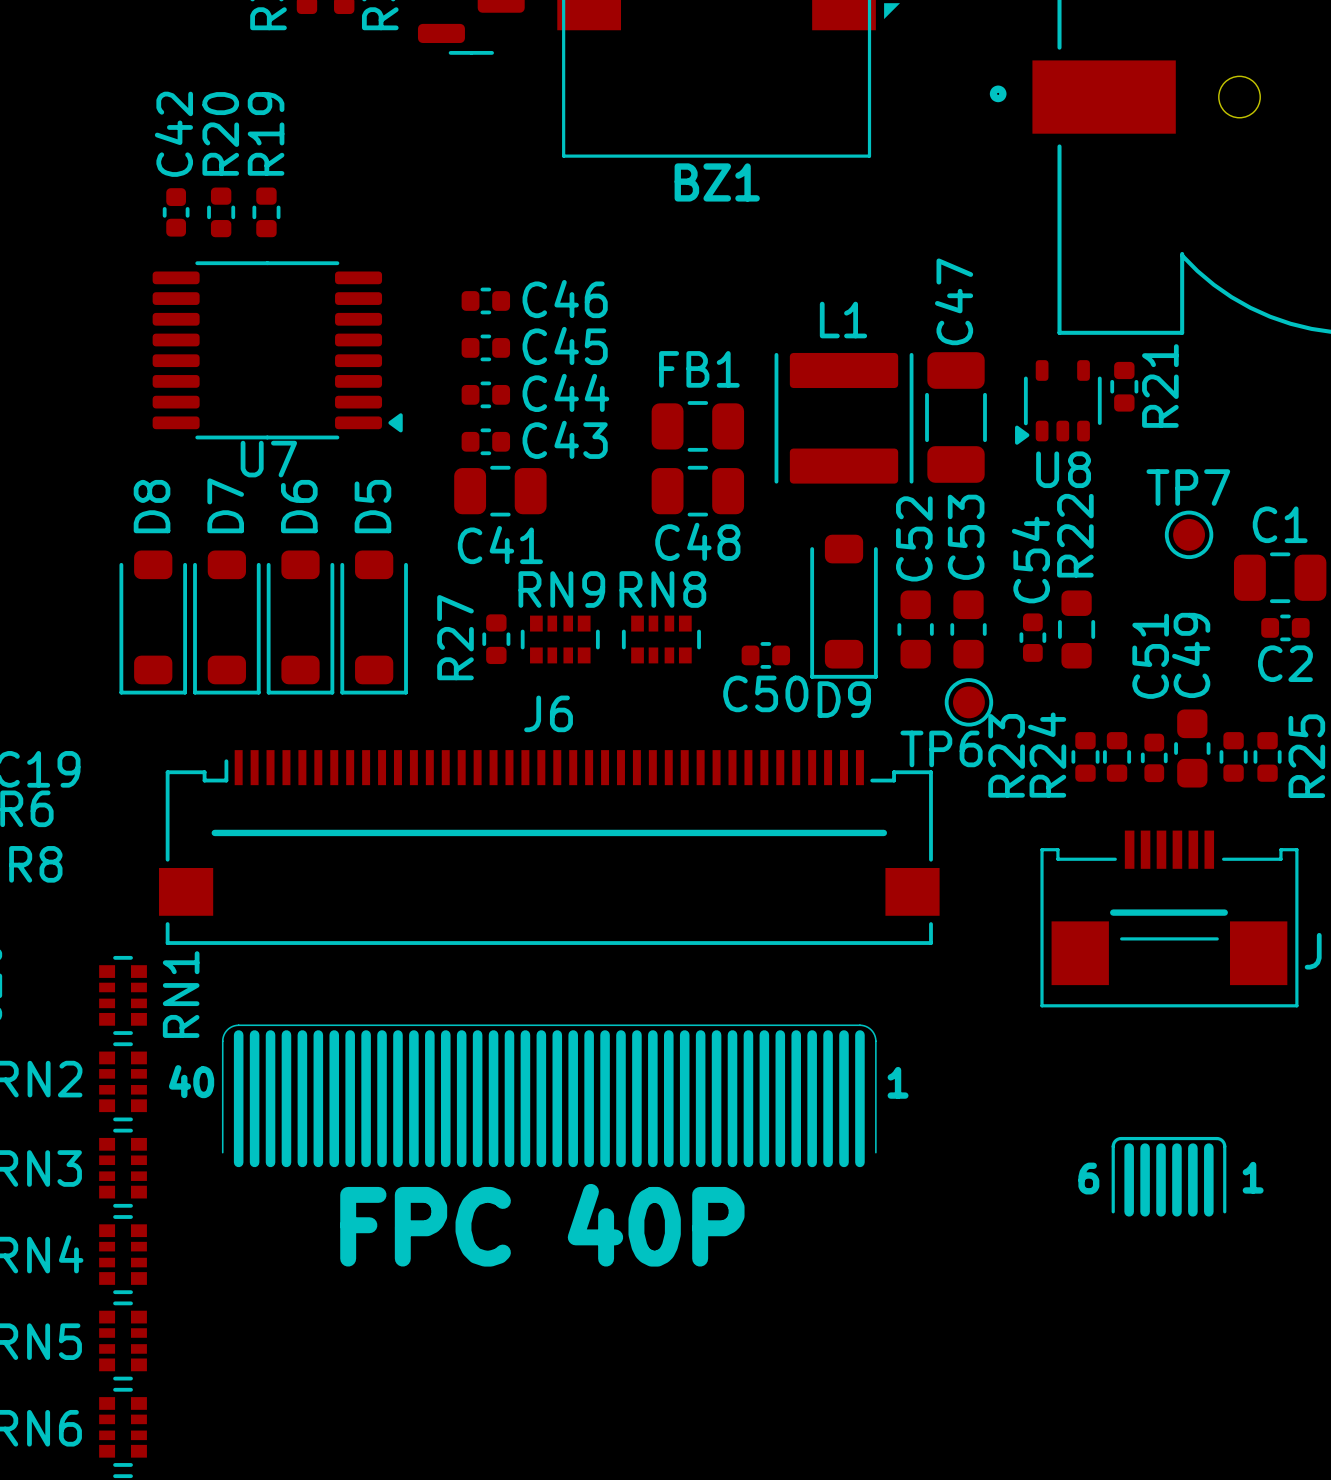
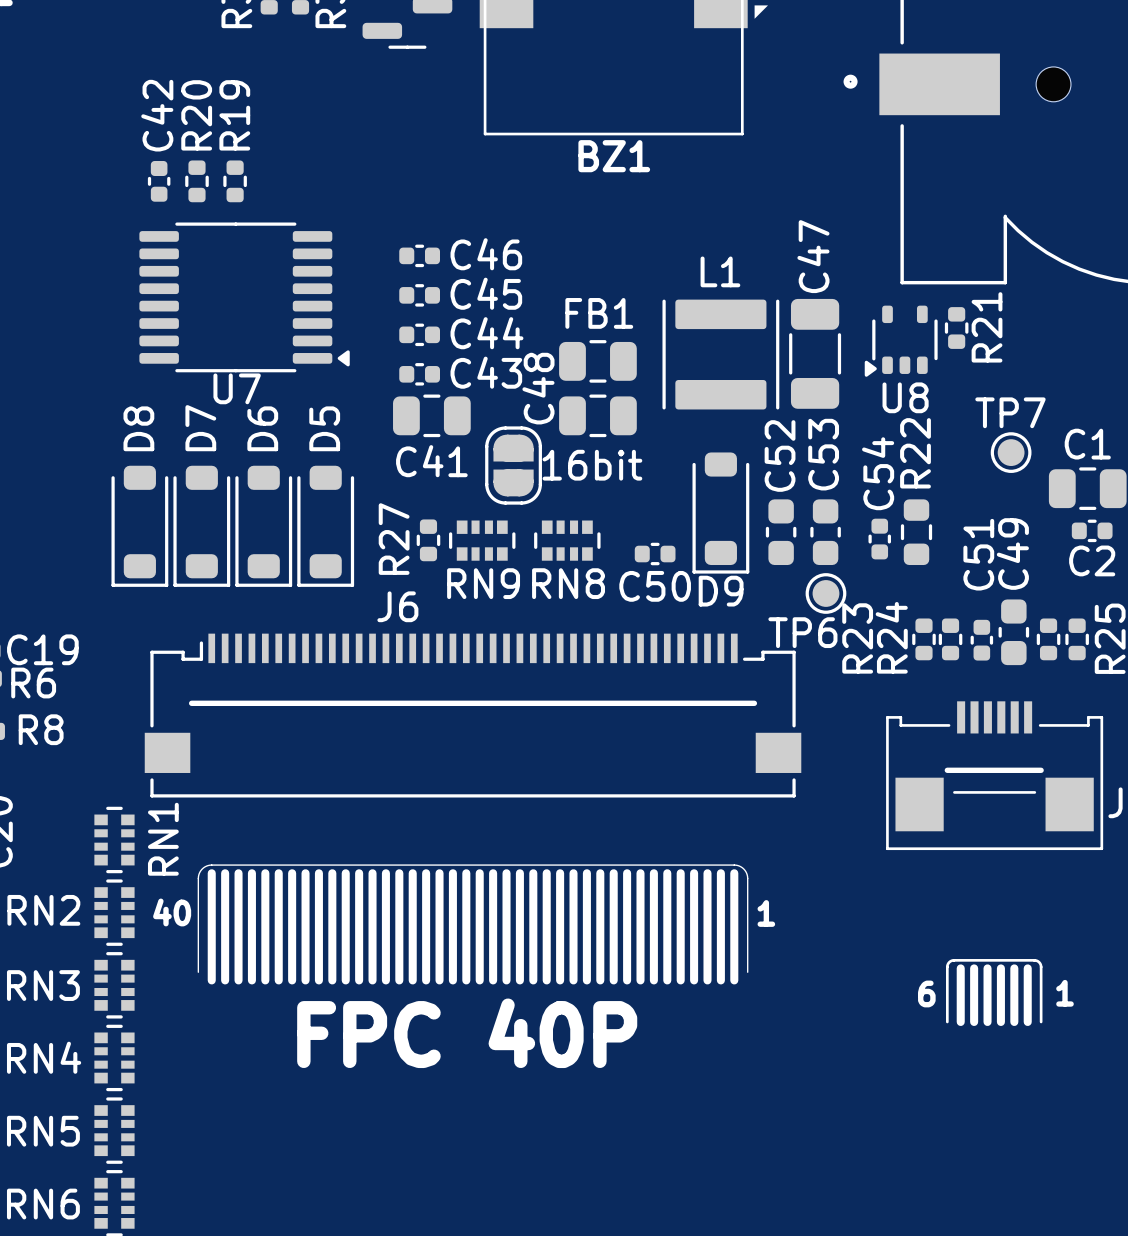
C48 name rotation: 0° (697, 541) -> 90° counterclockwise (538, 388)
16bit: none -> (513, 465)
RN9 name position: RN9 (561, 589) -> RN9 (483, 583)
RN8 name position: RN8 (662, 589) -> RN8 (568, 583)
J6 name position: J6 (548, 713) -> J6 (397, 606)

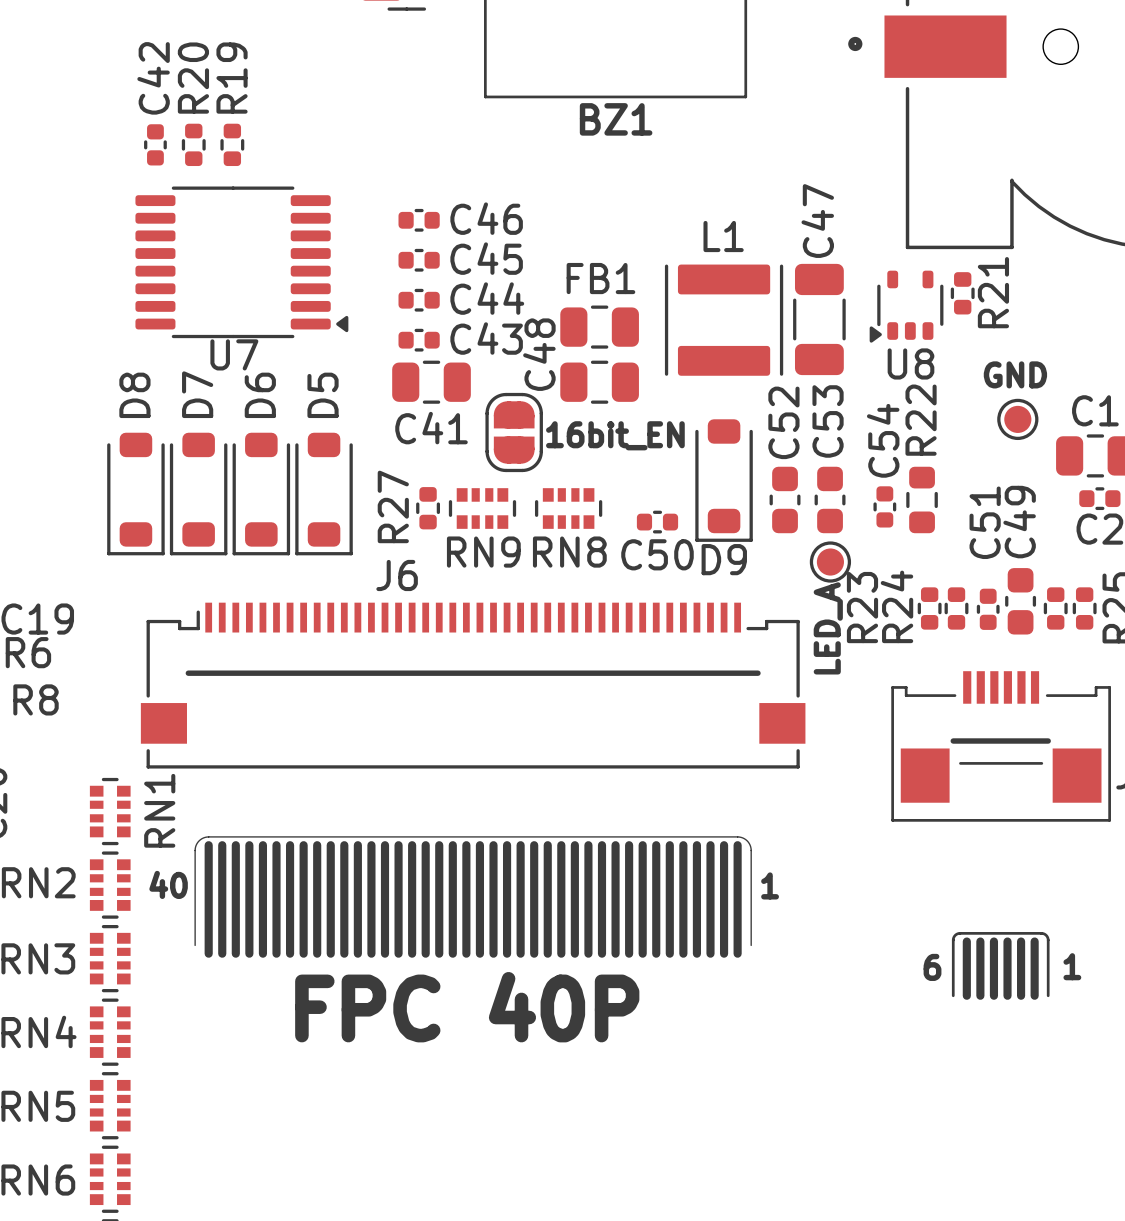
text: none -> GND (1015, 374)
TP7 name: TP7 (1010, 412) -> none
16bit name: 16bit (592, 465) -> none
text: none -> 16bit_EN (615, 435)
TP6 name: TP6 (802, 632) -> none
text: none -> LED_A (828, 628)

